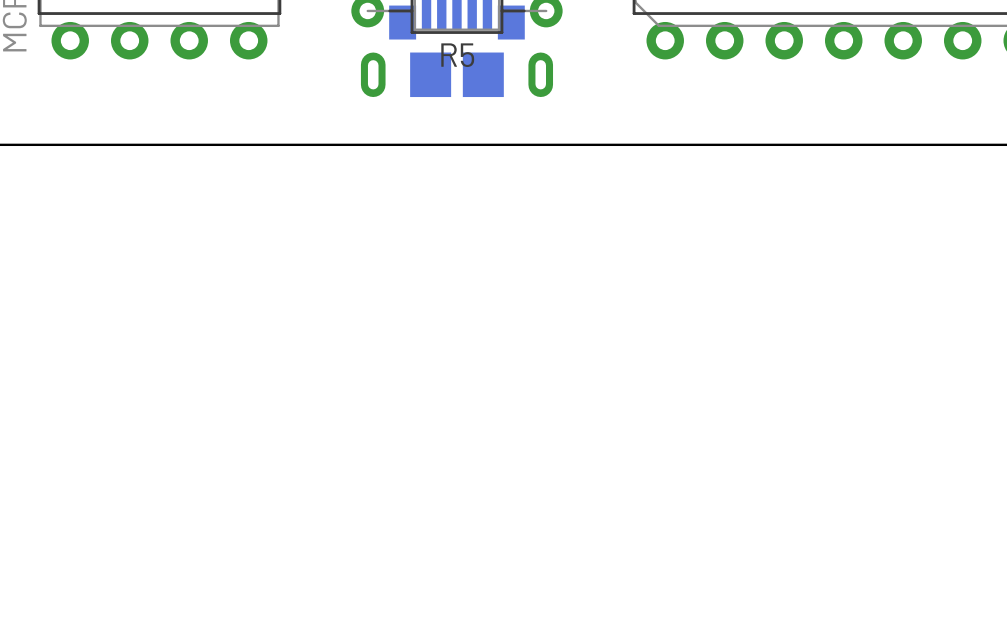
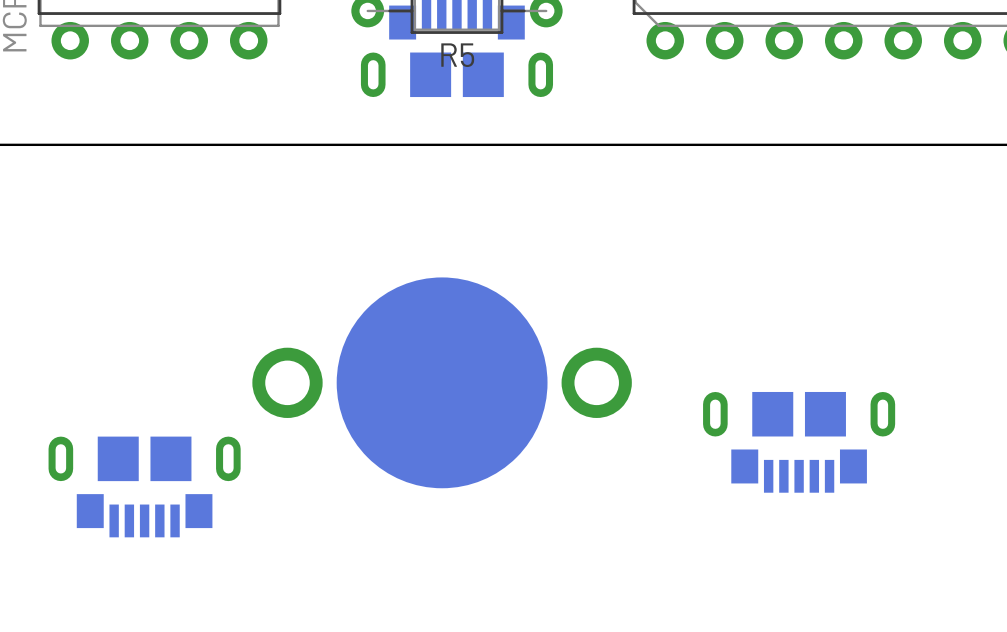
part: none -> (442, 382)
part: none -> (799, 442)
part: none -> (144, 486)

